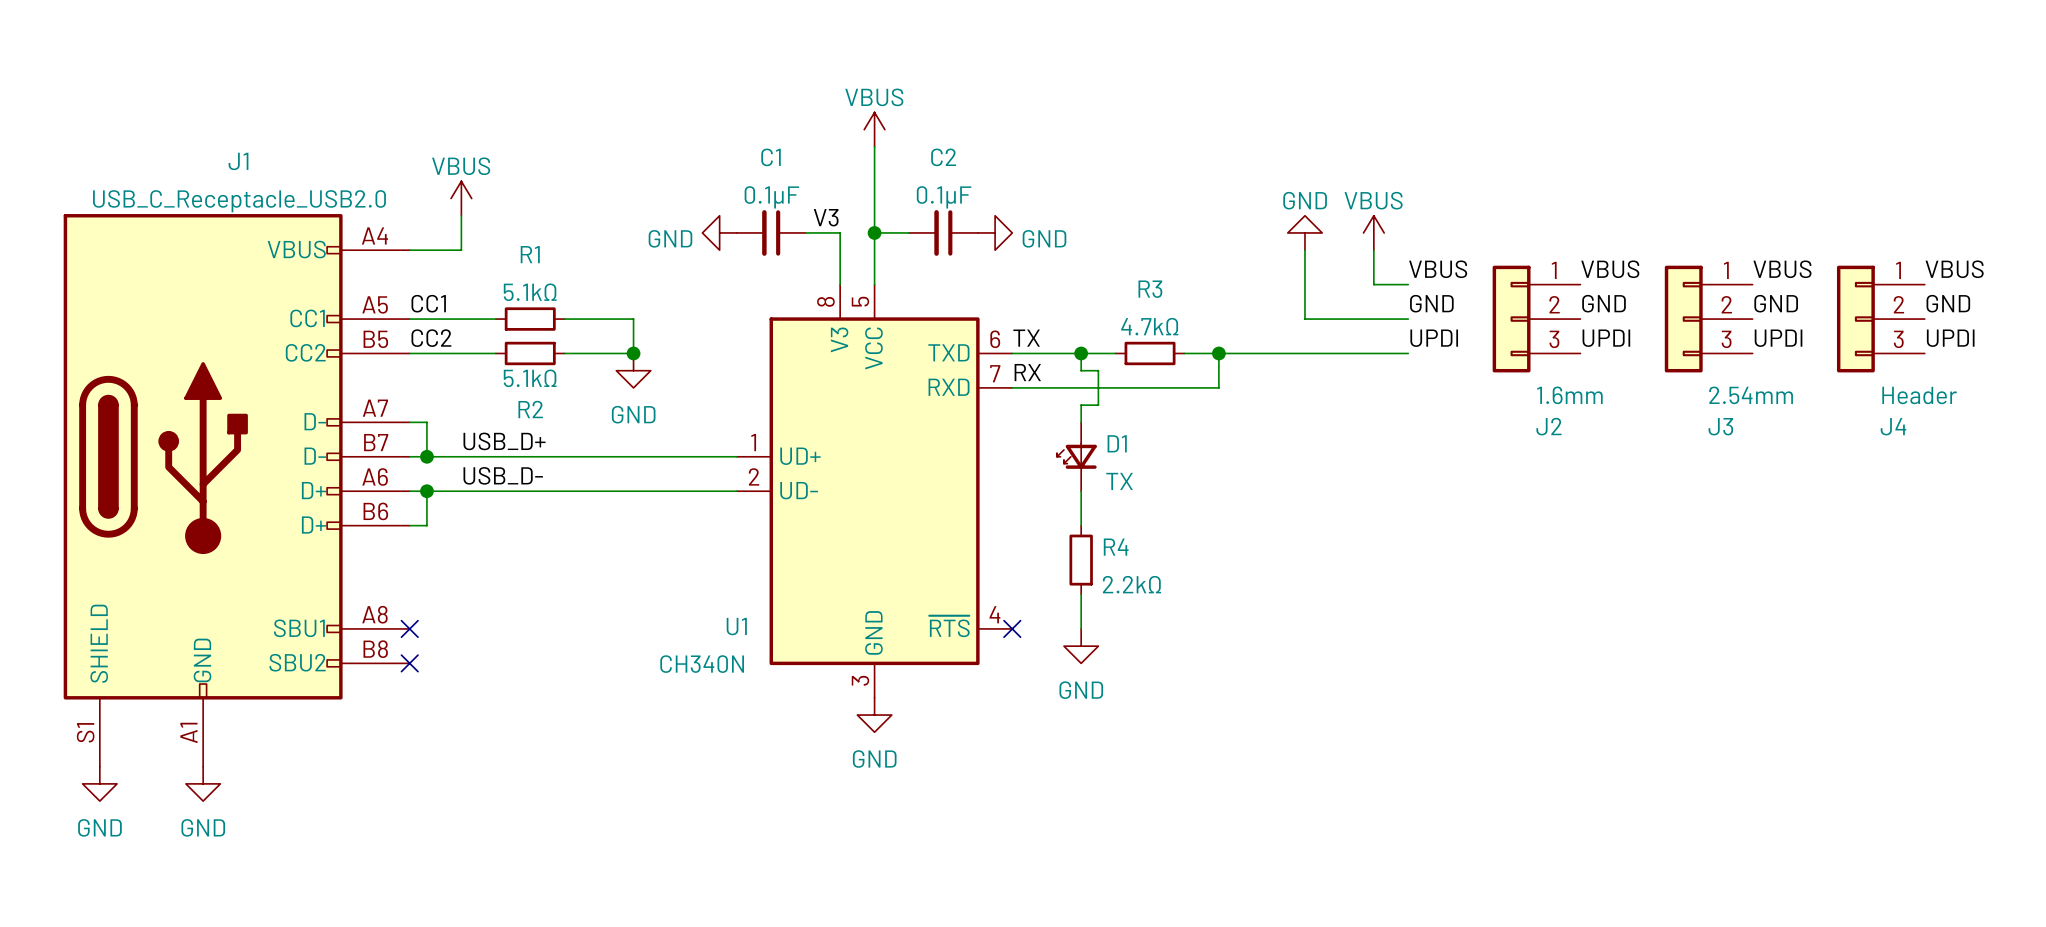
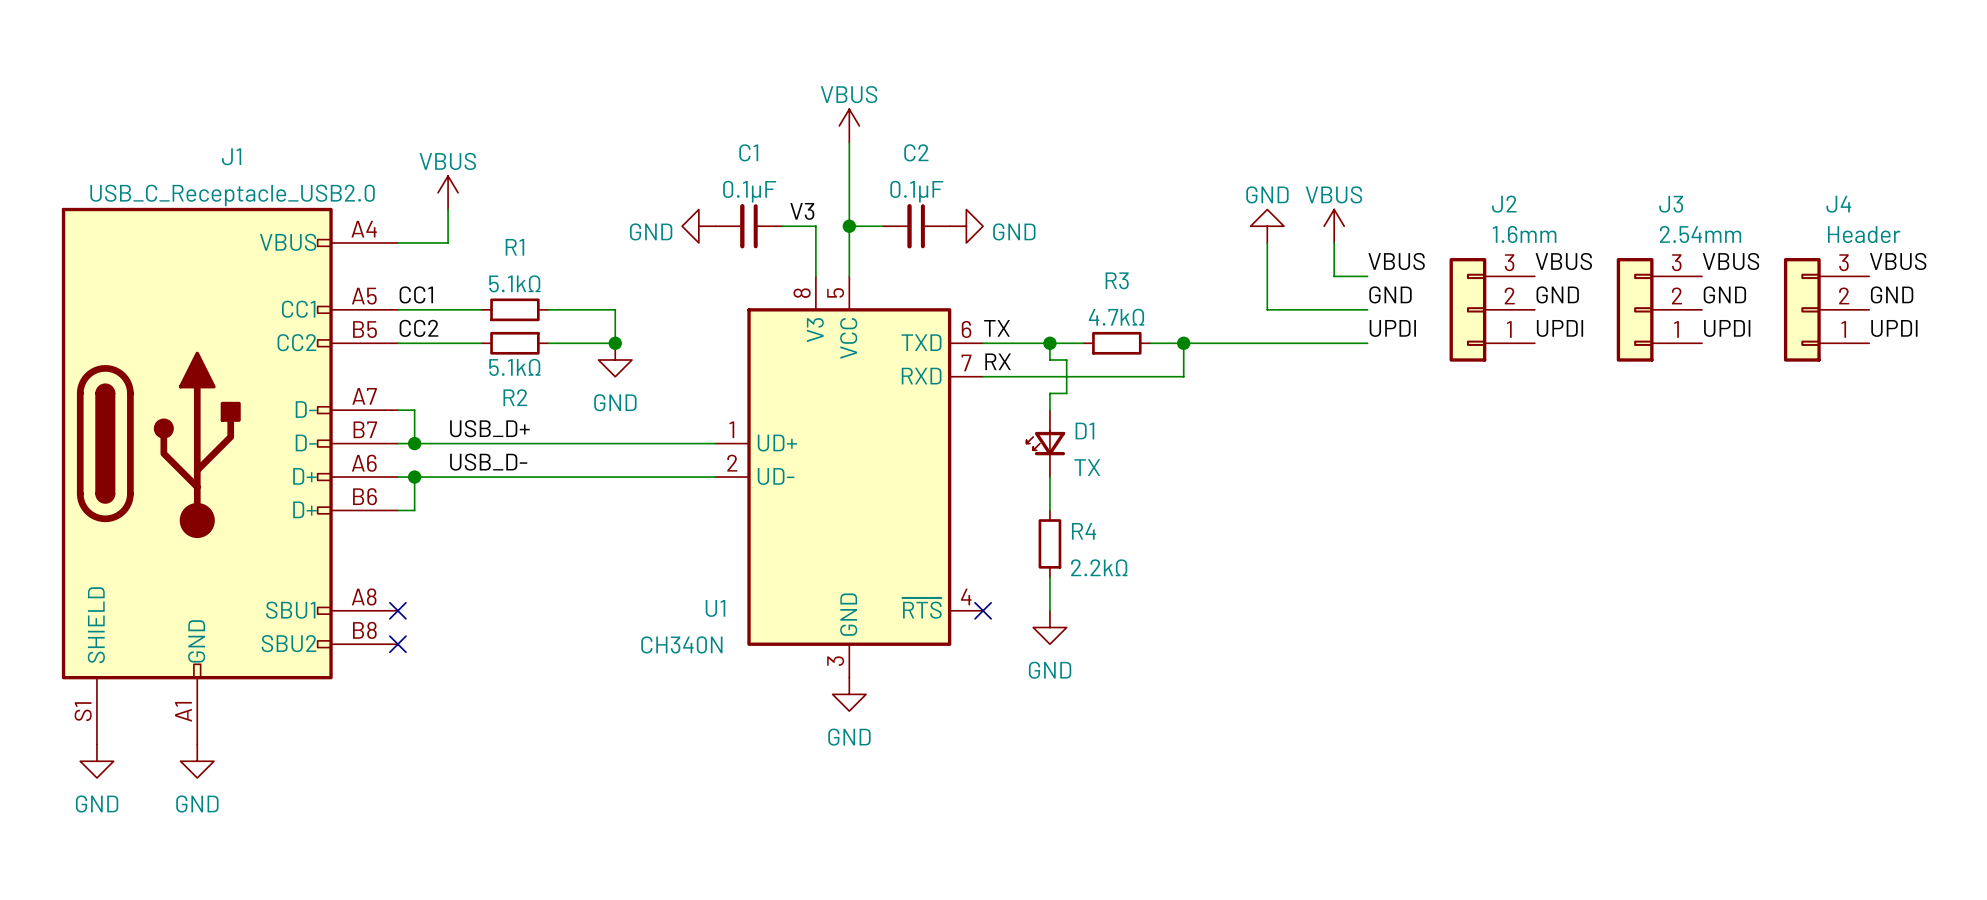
J2 flip: as is (1511, 319) -> up-down (1467, 309)
J3 flip: as is (1683, 319) -> up-down (1635, 309)
J4 flip: as is (1855, 319) -> up-down (1802, 309)

